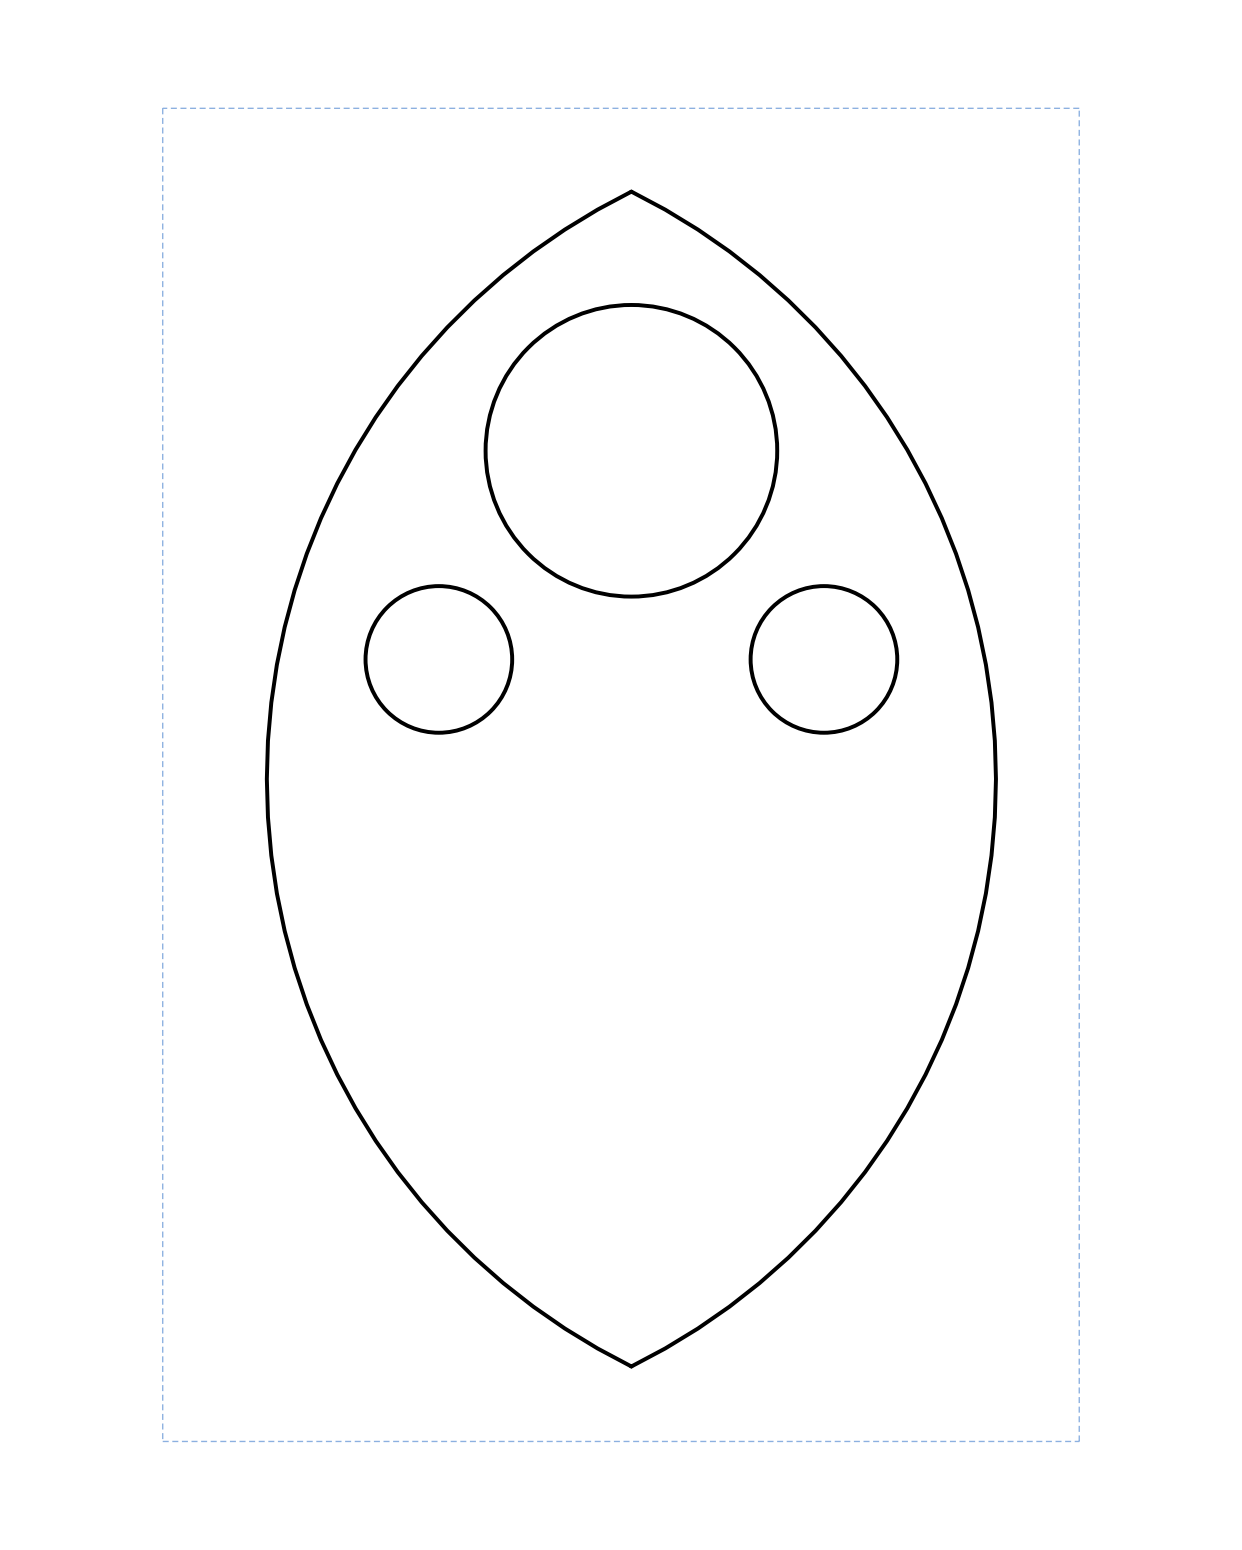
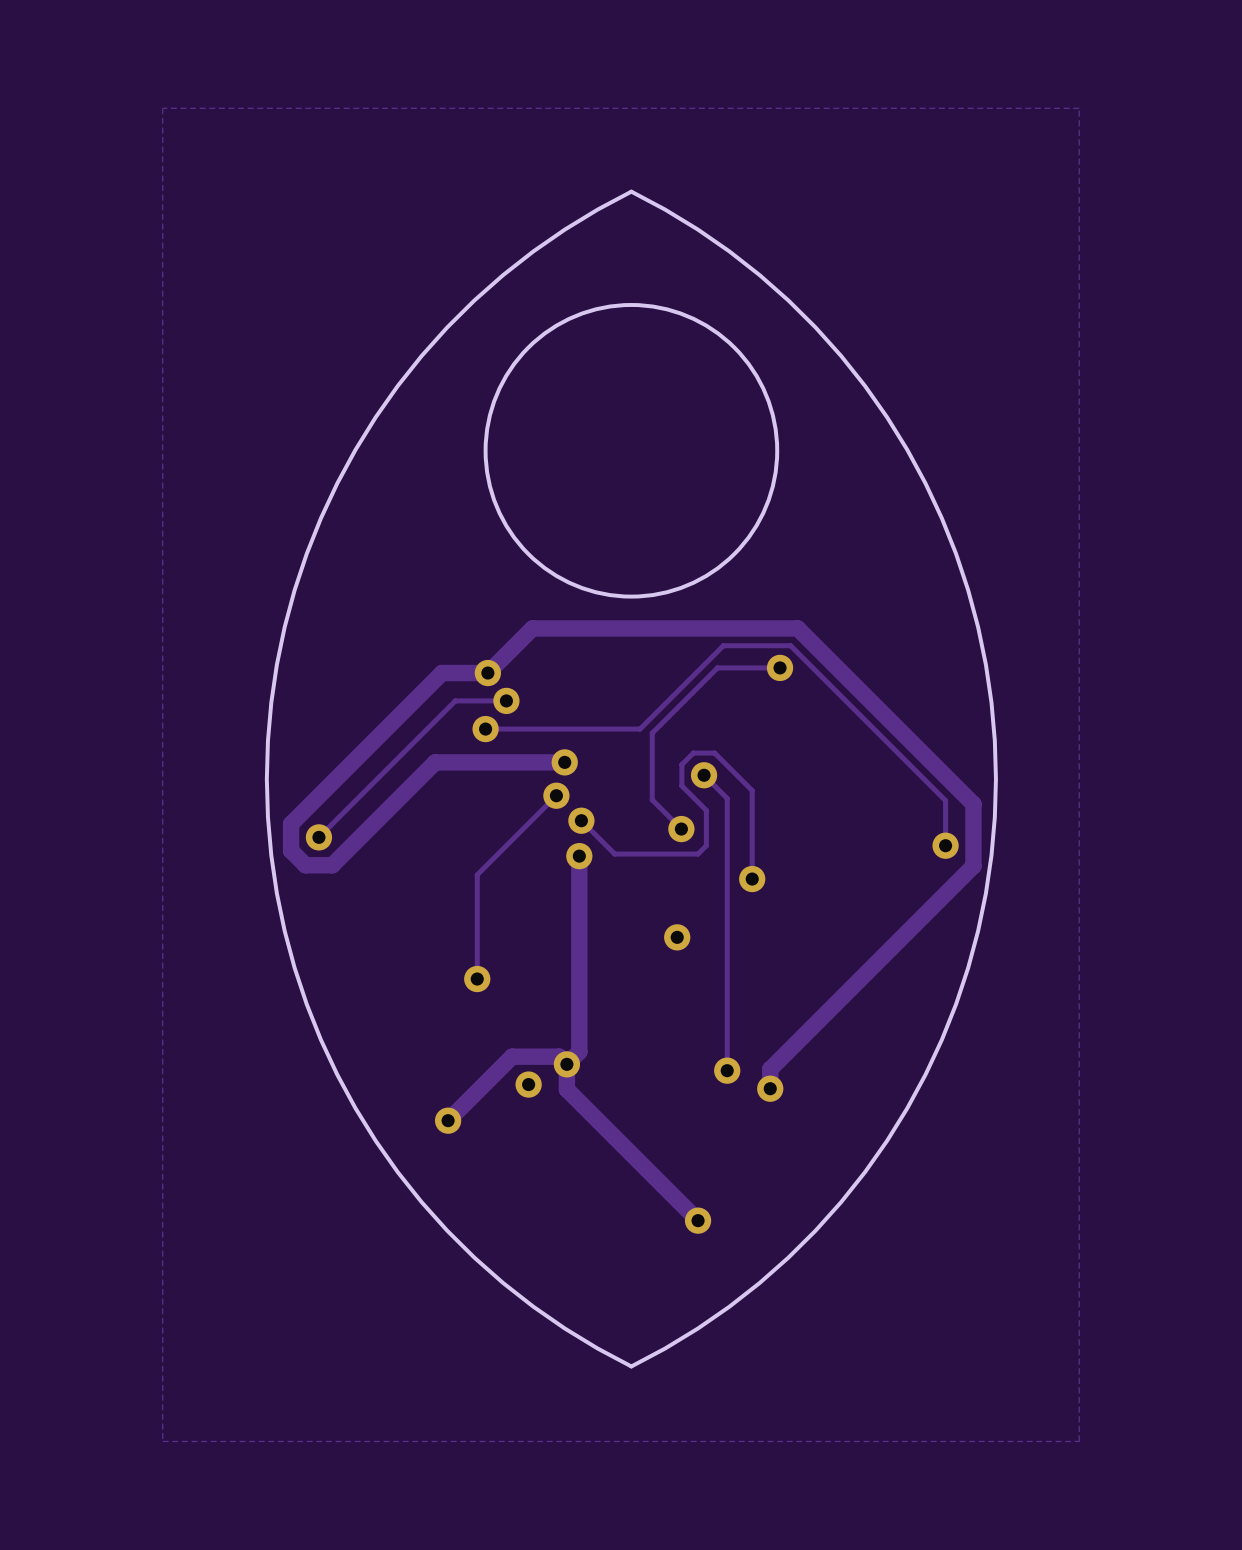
round board edge: [363, 584, 515, 735] -> none
round board edge: [748, 584, 900, 735] -> none
track: none -> (780, 667) (717, 667) (652, 733) (652, 799) (681, 829)
via: none -> (780, 667)
via: none -> (487, 673)
track: none -> (506, 700) (455, 700) (318, 837)
via: none -> (506, 700)
via: none -> (485, 729)
track: none -> (493, 729) (640, 729) (723, 645) (790, 645) (945, 800) (945, 845)
track: none -> (564, 762) (435, 762) (332, 865) (305, 865) (291, 850) (291, 823) (442, 673) (487, 673) (532, 628) (797, 628) (973, 804) (973, 866) (770, 1069) (770, 1088)
via: none -> (564, 762)
track: none -> (704, 775) (727, 798) (727, 1070)
via: none -> (704, 775)
track: none -> (556, 795) (477, 874) (477, 979)
via: none -> (556, 795)
track: none -> (581, 820) (614, 854) (698, 854) (706, 845) (706, 810) (681, 785) (681, 764) (693, 753) (714, 753) (752, 790) (752, 879)
via: none -> (581, 820)
via: none -> (681, 829)
via: none -> (318, 837)
via: none -> (945, 845)
track: none -> (579, 856) (579, 1051) (566, 1064)
via: none -> (579, 856)
via: none -> (752, 879)
via: none -> (677, 937)
via: none -> (477, 979)
track: none -> (566, 1064) (559, 1056) (512, 1056) (448, 1120)
track: none -> (566, 1064) (566, 1089) (698, 1220)
via: none -> (566, 1064)
via: none -> (727, 1070)
via: none -> (528, 1084)
via: none -> (770, 1088)
via: none -> (448, 1120)
via: none -> (698, 1220)

